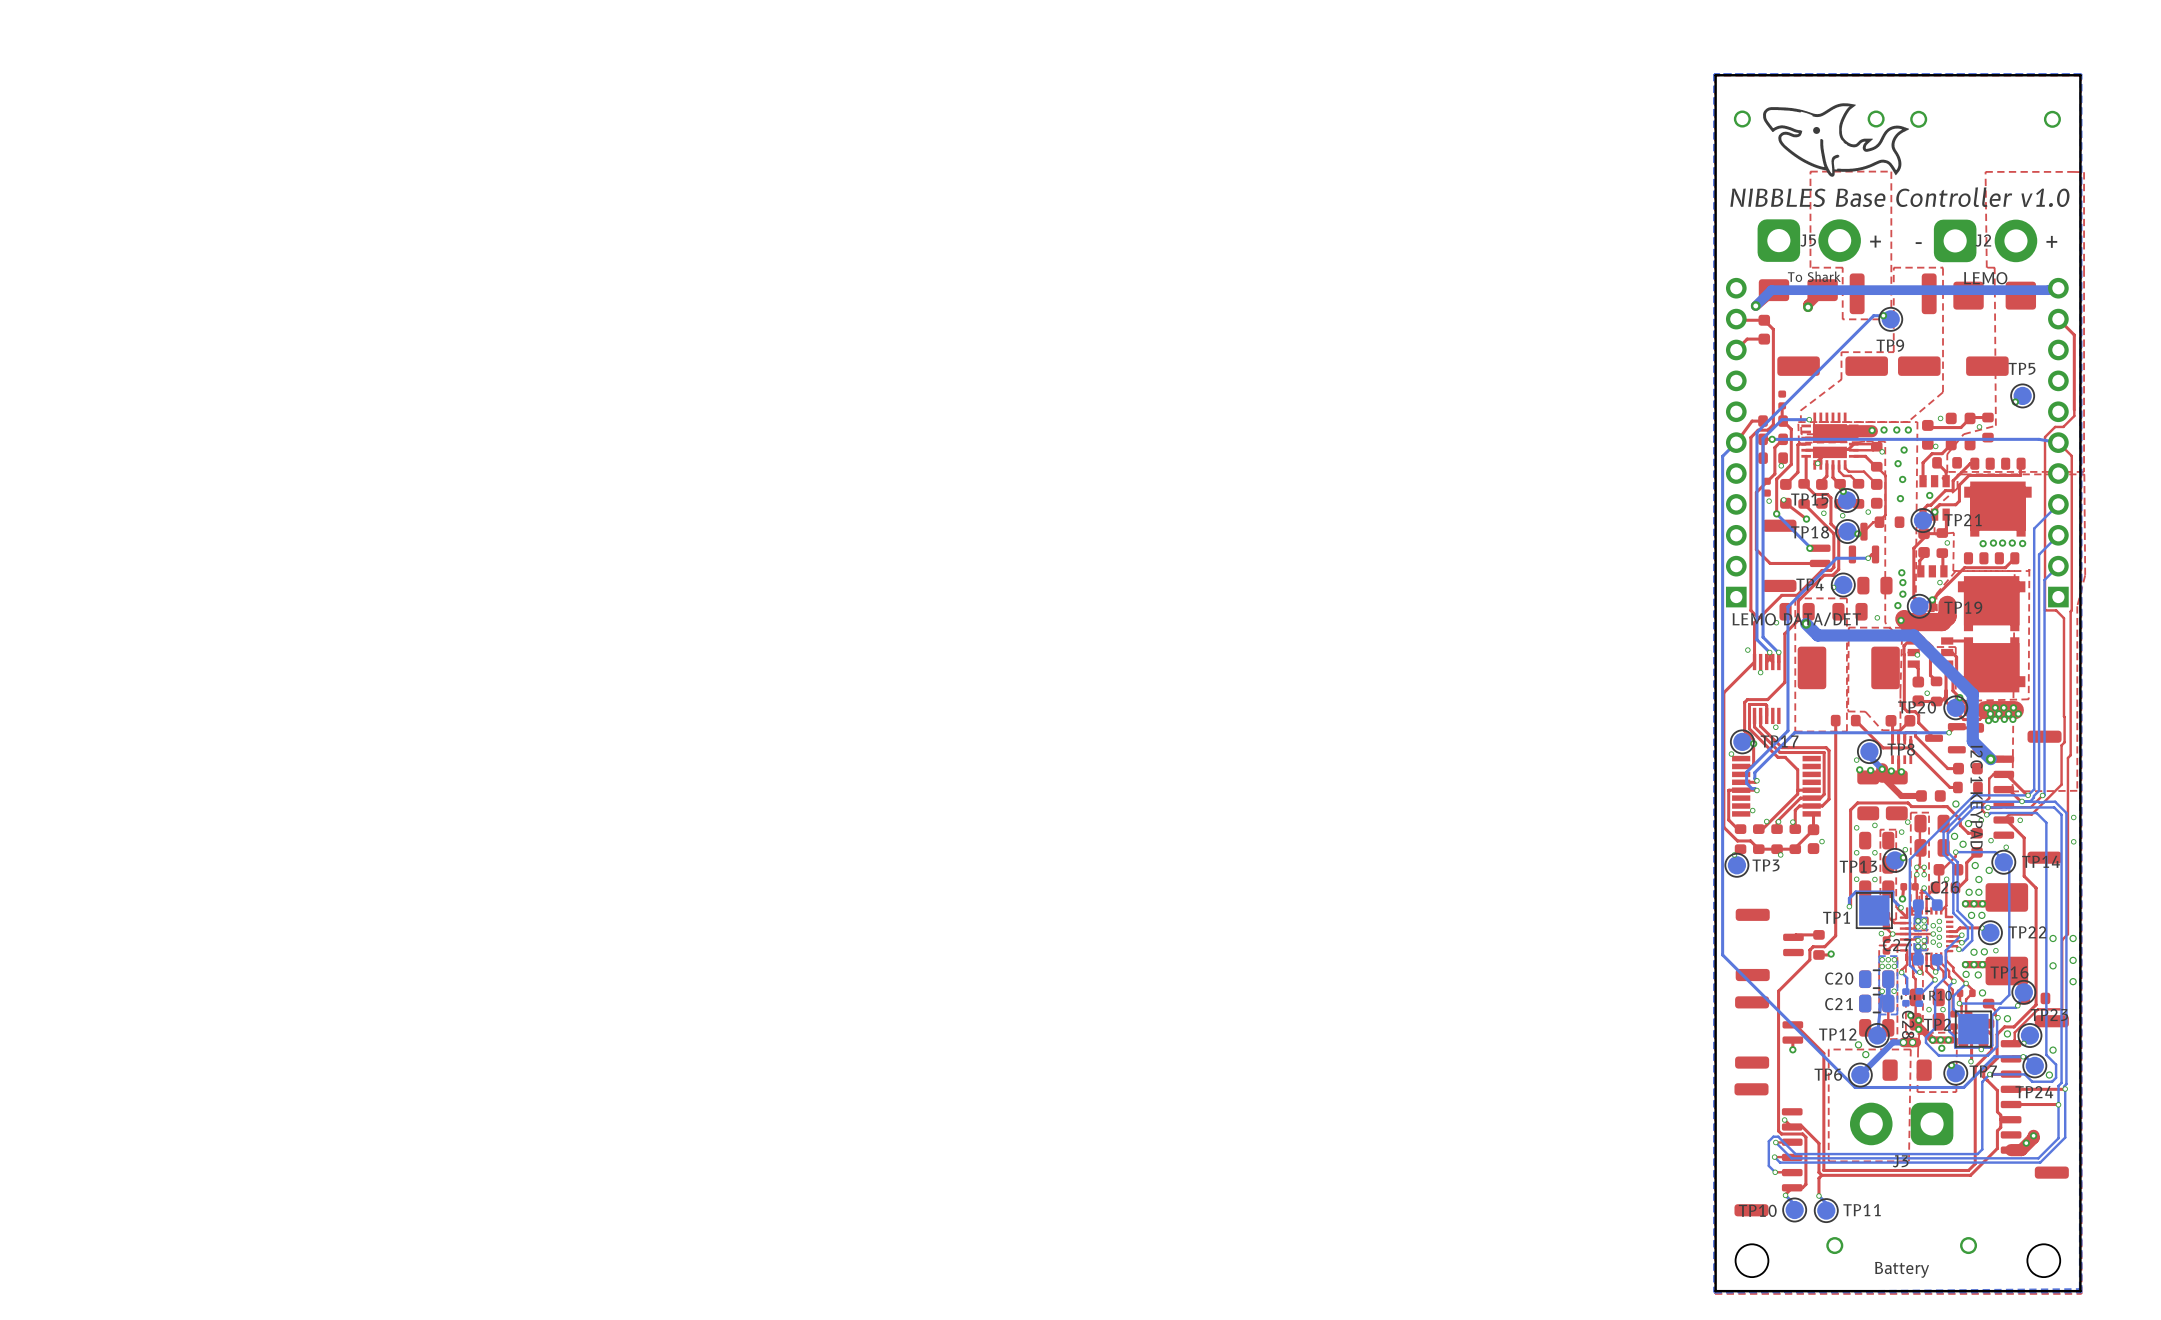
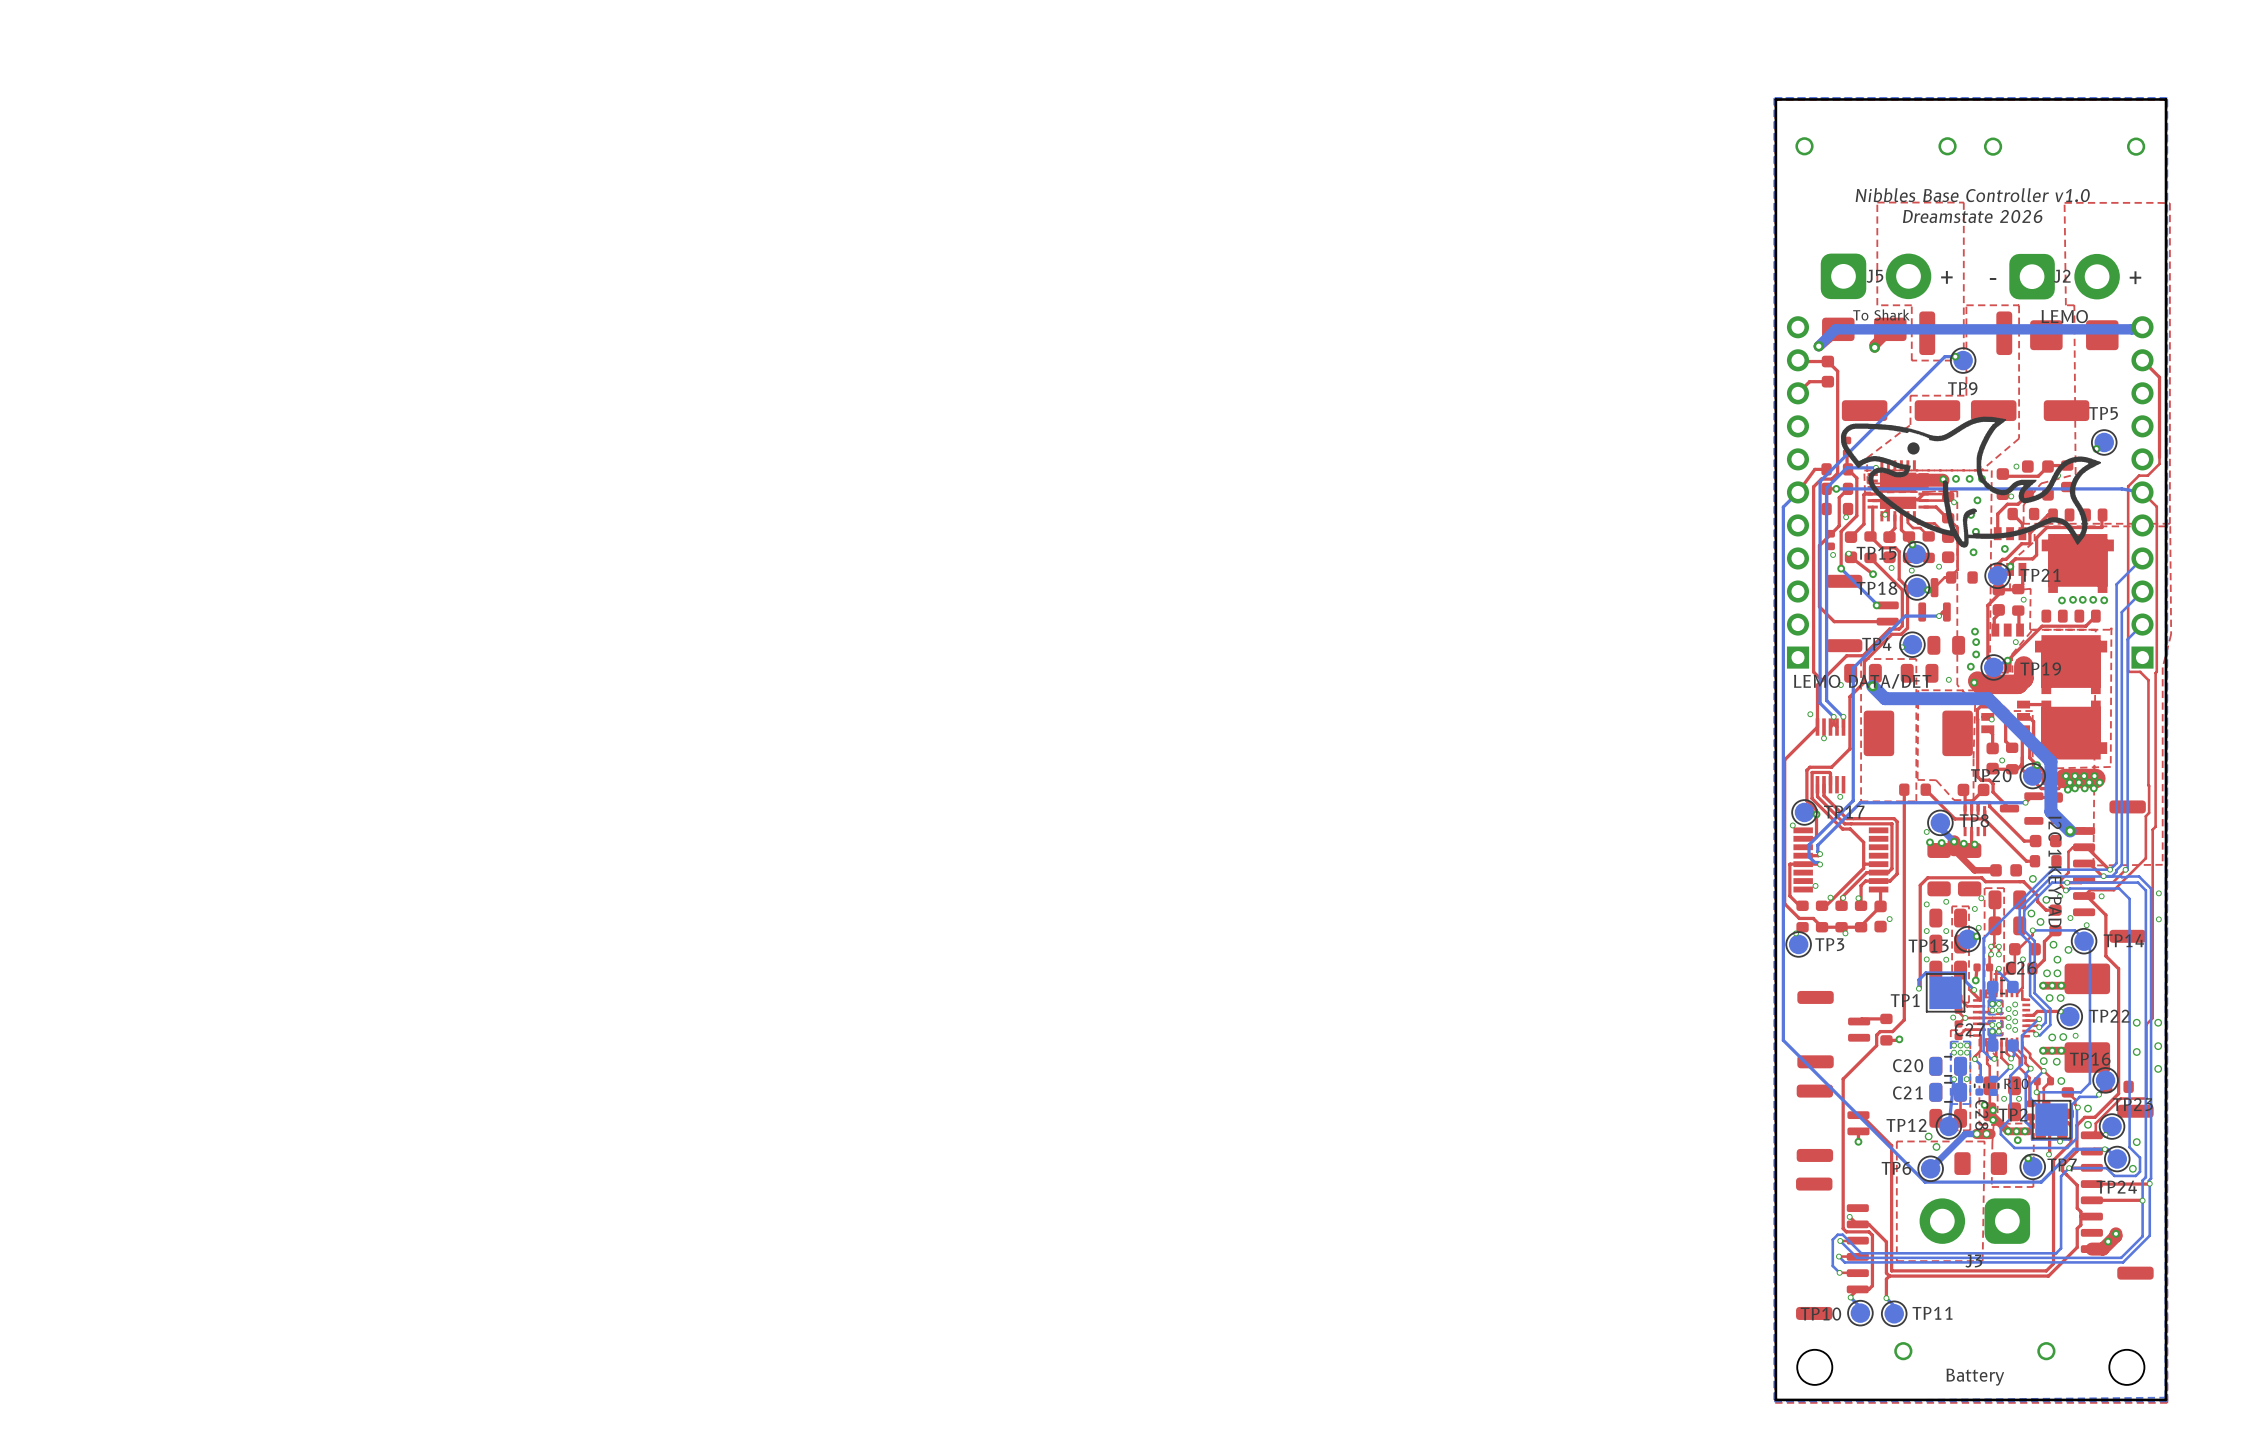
drawing: [1763, 103, 1909, 177] -> none
text: none -> Nibbles Base Controller v1.0 (1972, 195)
text: none -> Dreamstate 2026 (1972, 216)
text: NIBBLES Base Controller v1.0 (1899, 197) -> none
drawing: none -> [1840, 416, 2101, 548]

